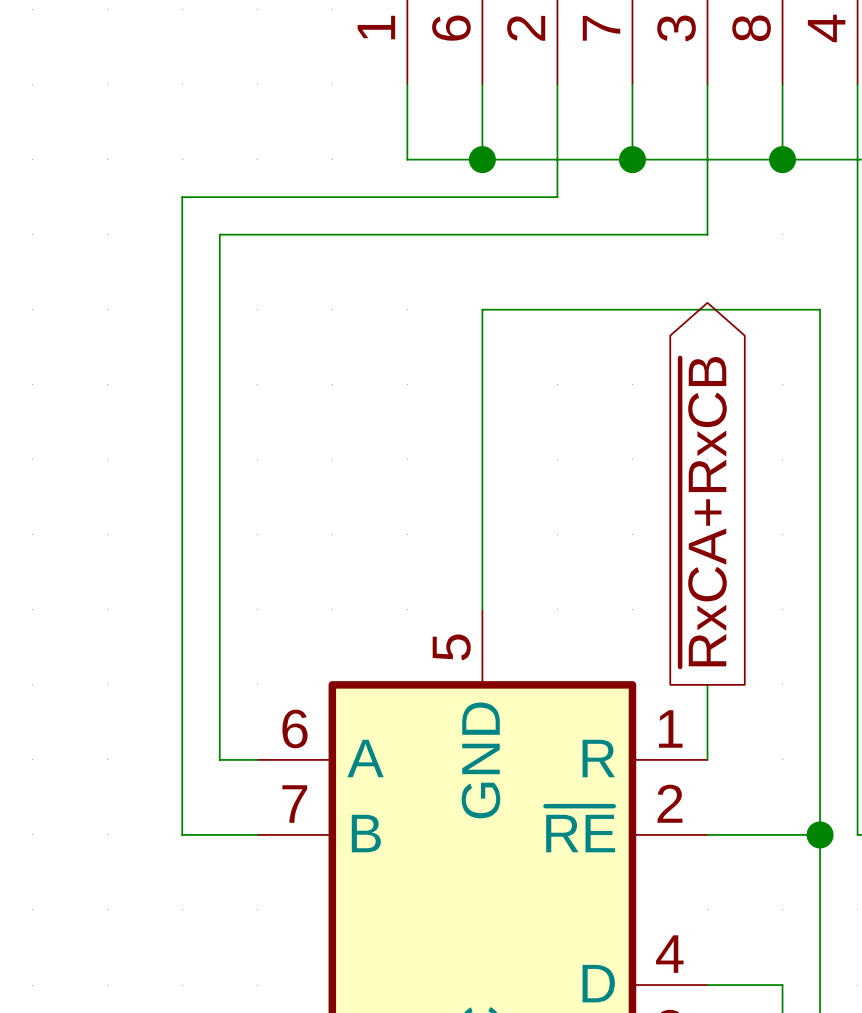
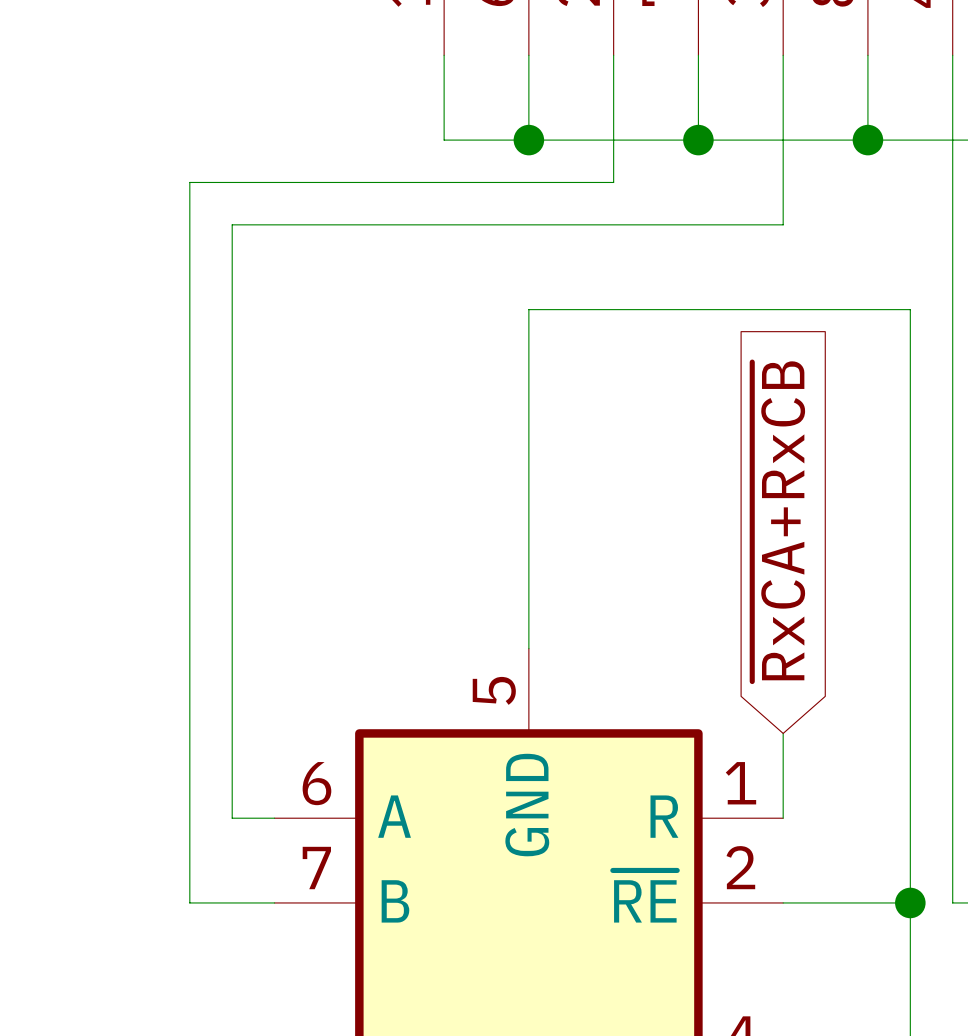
global label shape: output (703, 512) -> input (778, 521)

